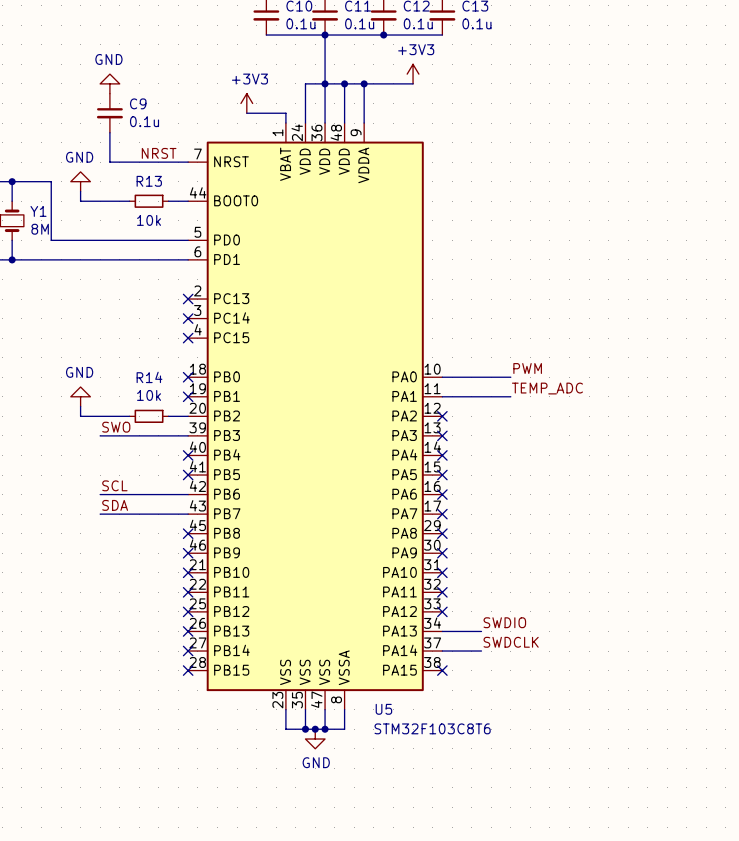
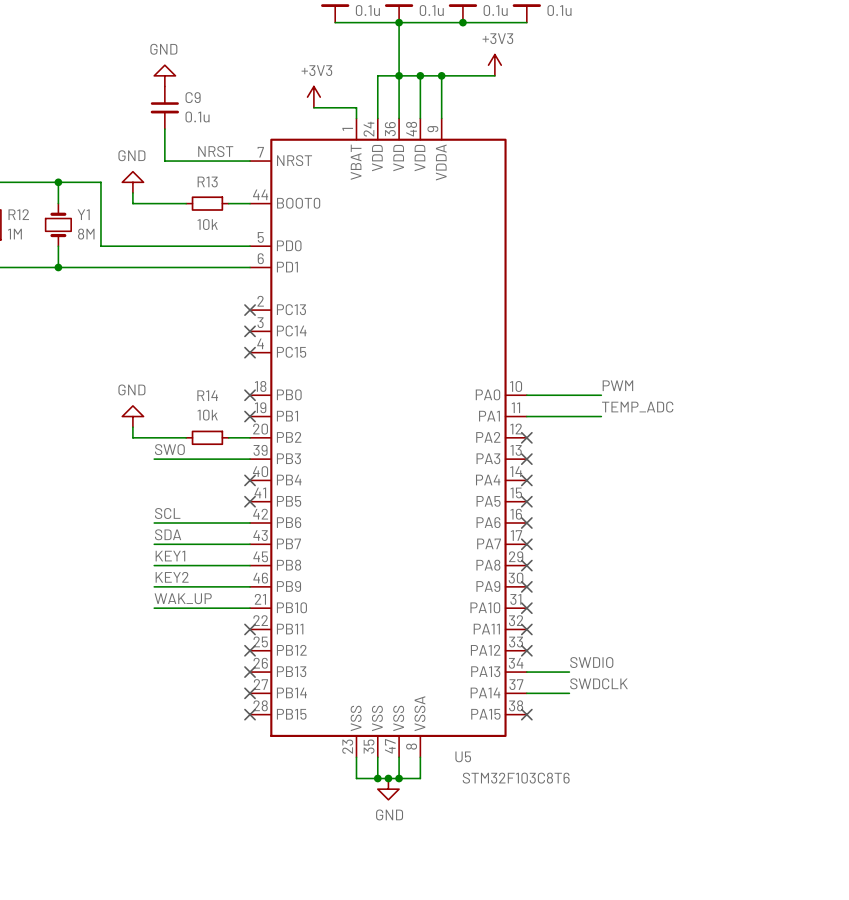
label: none -> KEY1 (170, 556)
wire: none -> (154, 565) (250, 565)
no-connect mark: (188, 533) -> none
label: none -> KEY2 (172, 577)
wire: none -> (154, 586) (250, 586)
no-connect mark: (188, 553) -> none
label: none -> WAK_UP (183, 598)
wire: none -> (154, 608) (250, 608)
no-connect mark: (188, 572) -> none

